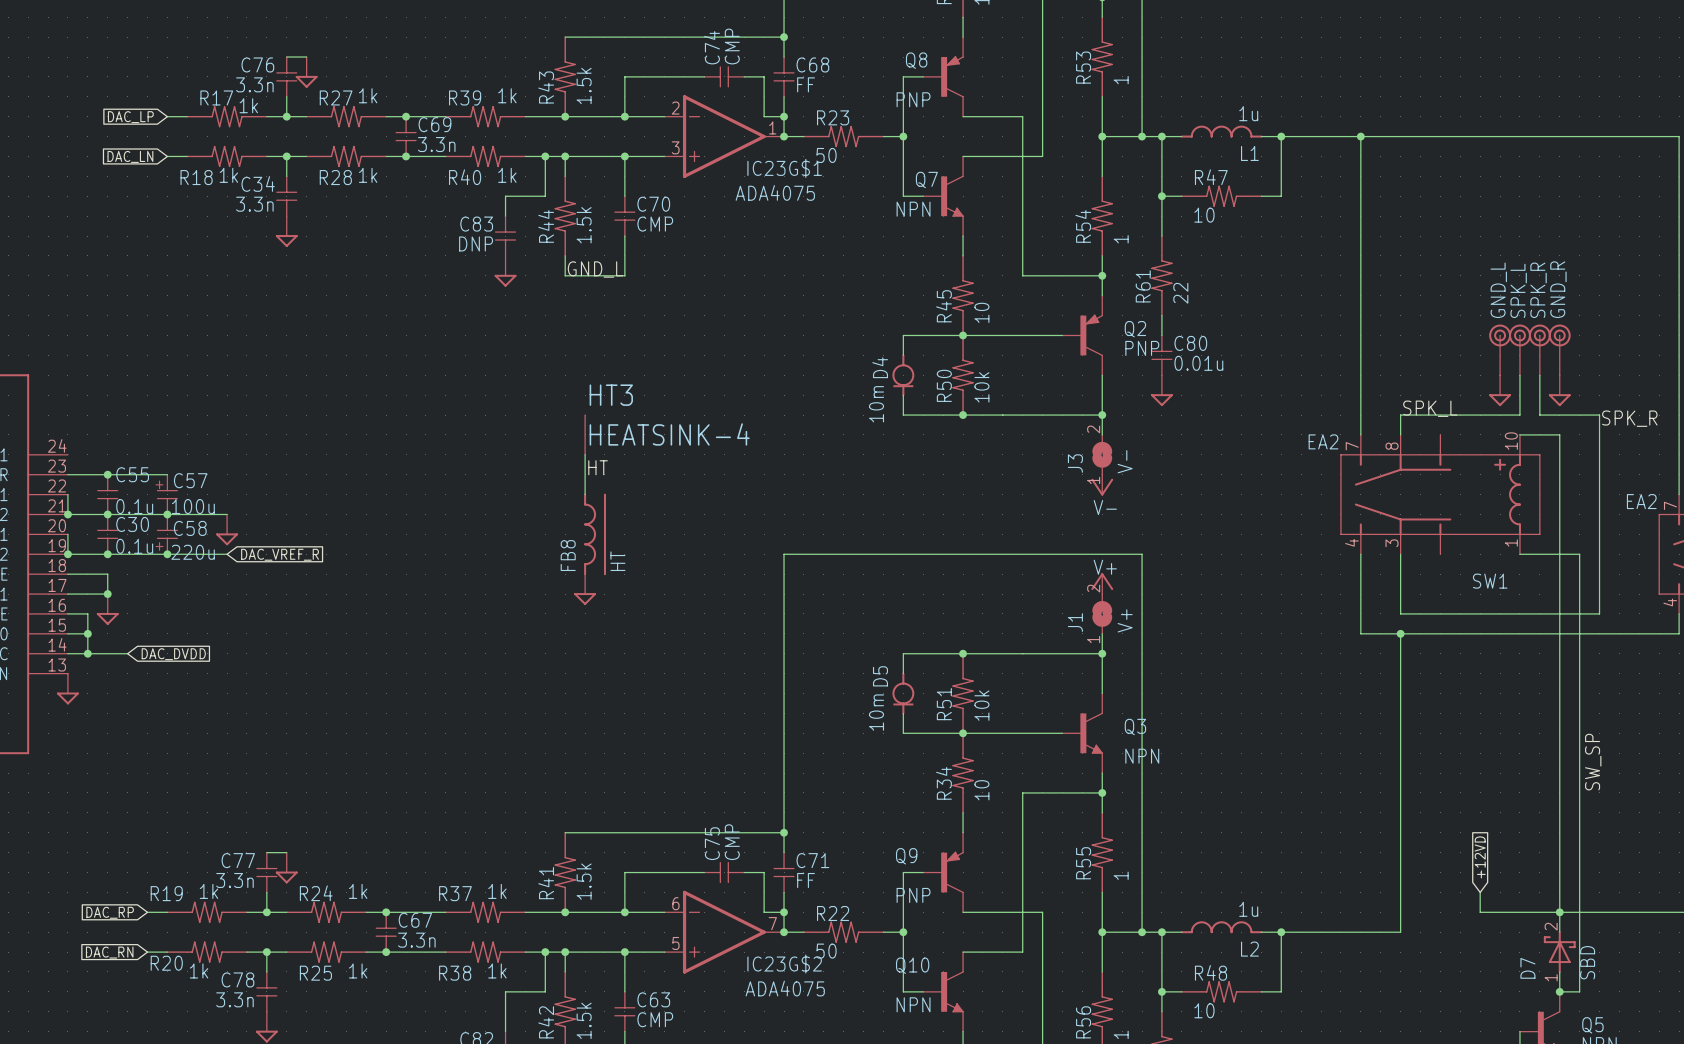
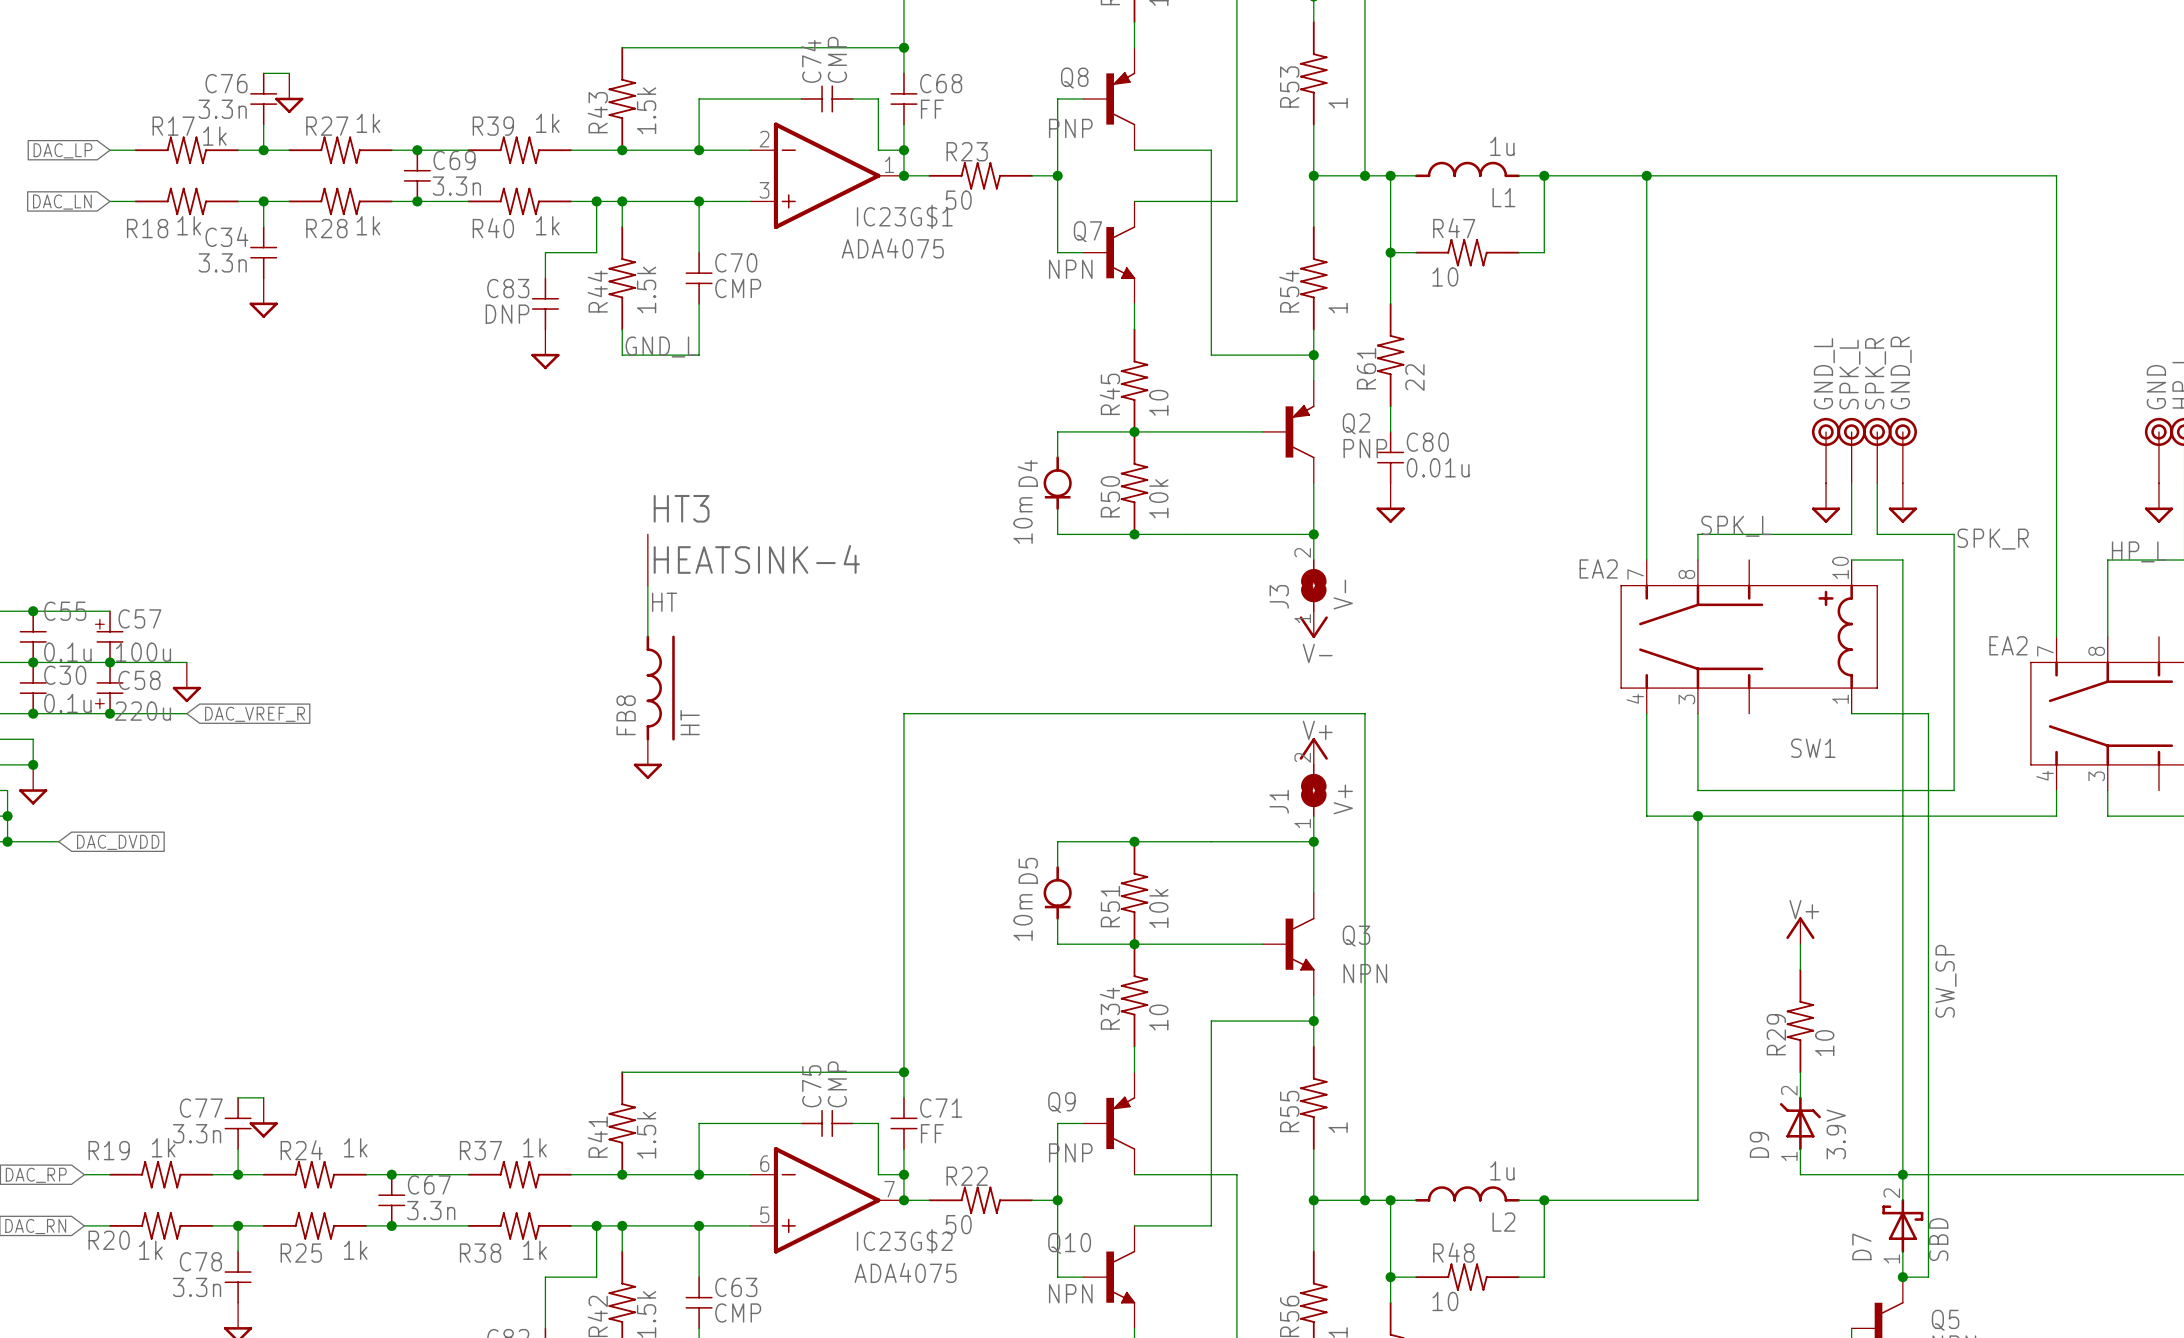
power symbol: none -> V+ (1800, 930)
wire: none -> (1800, 944) (1800, 969)
R29: none -> 10 (1800, 1021)
wire: none -> (1800, 1072) (1800, 1097)
global label: +12VD (1480, 857) -> none
D9: none -> 3.9V (1800, 1123)

